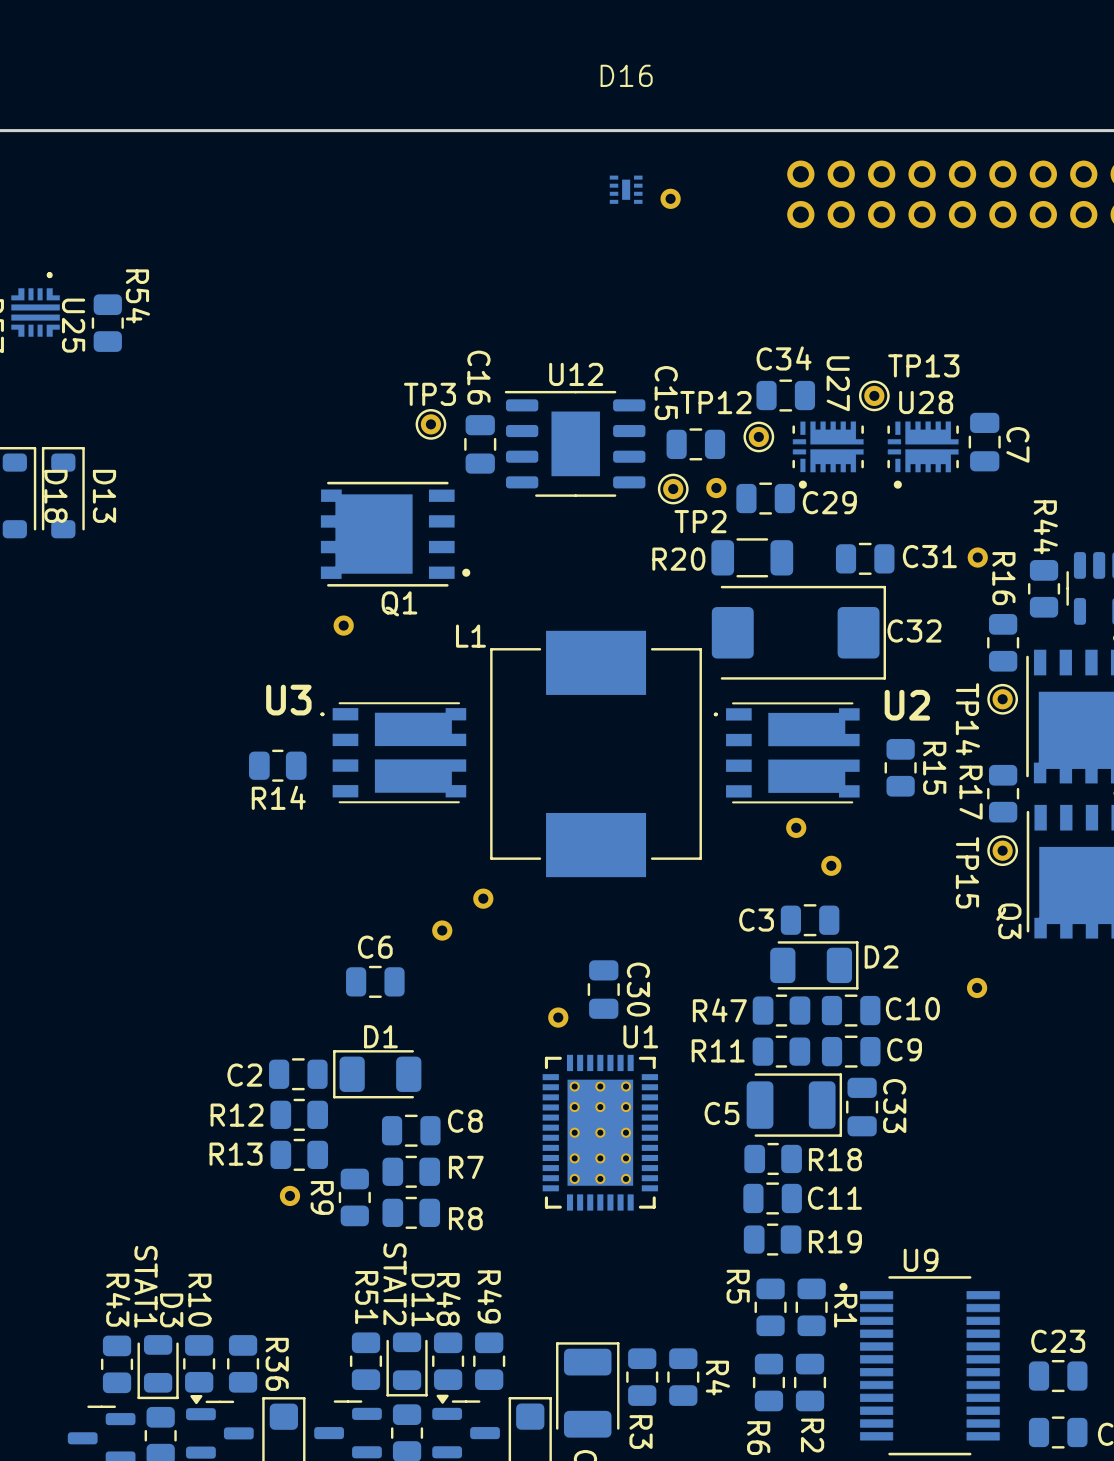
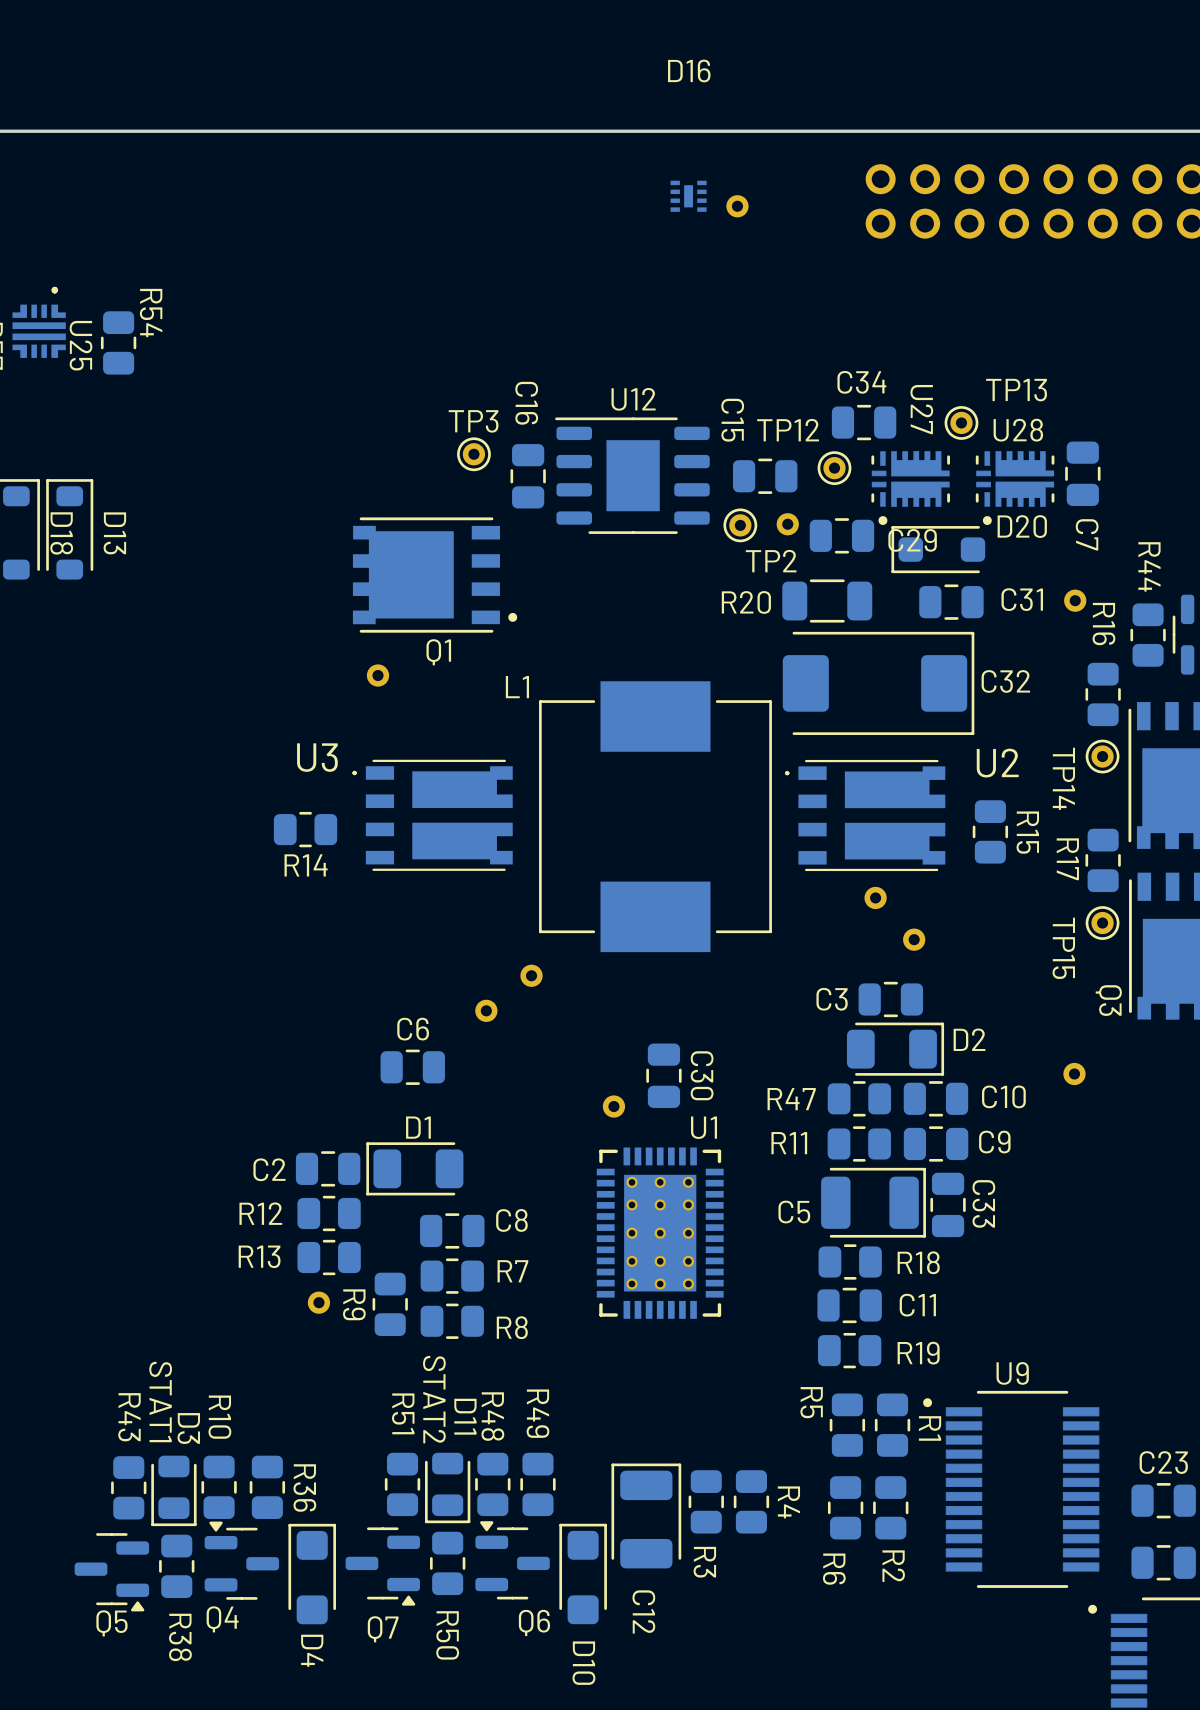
C7 name position: C7 (1017, 444) -> C7 (1087, 534)
D20: none -> (938, 549)

